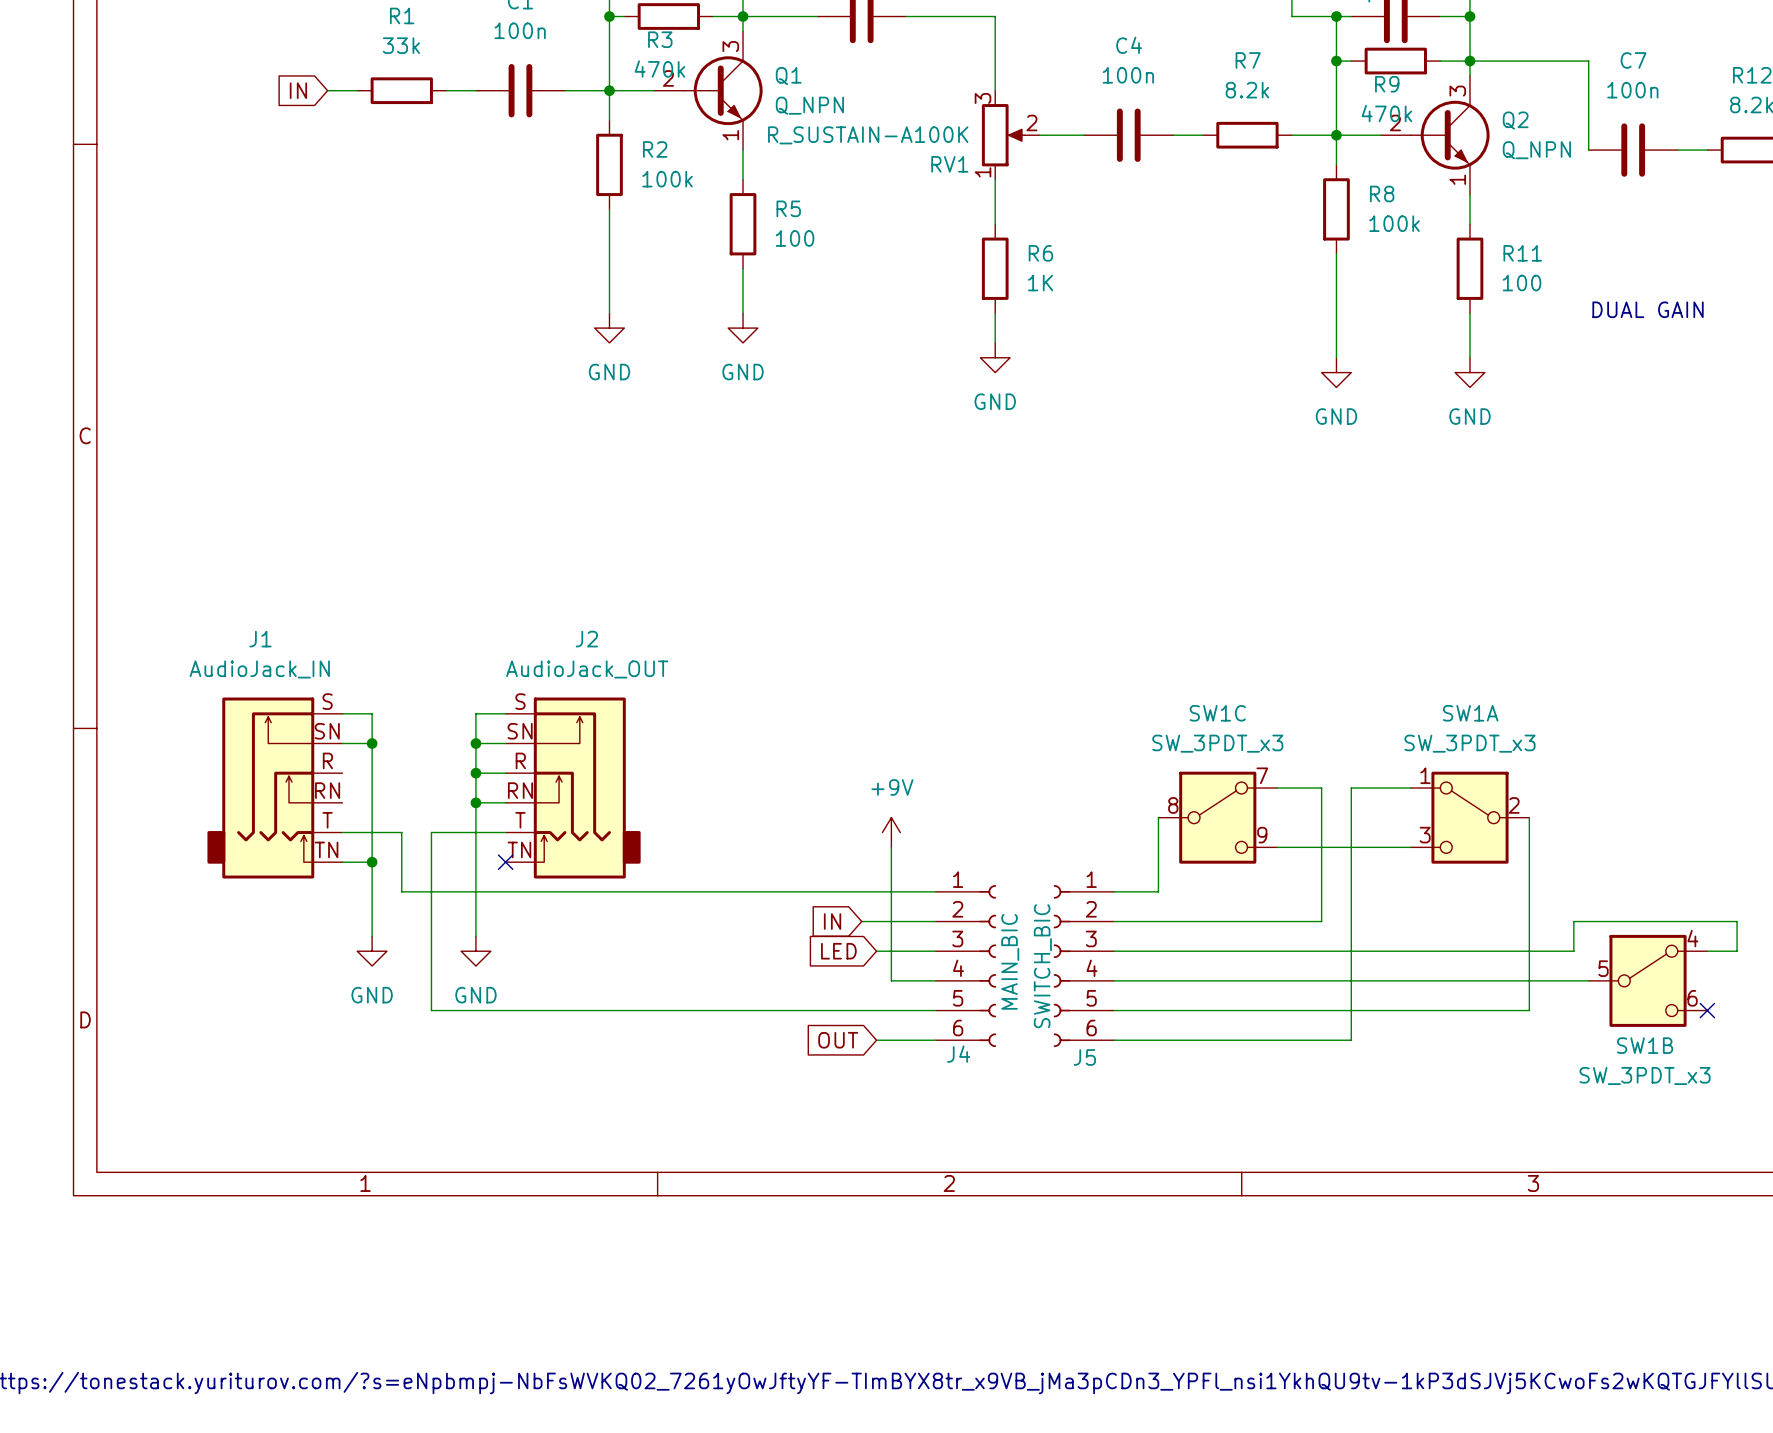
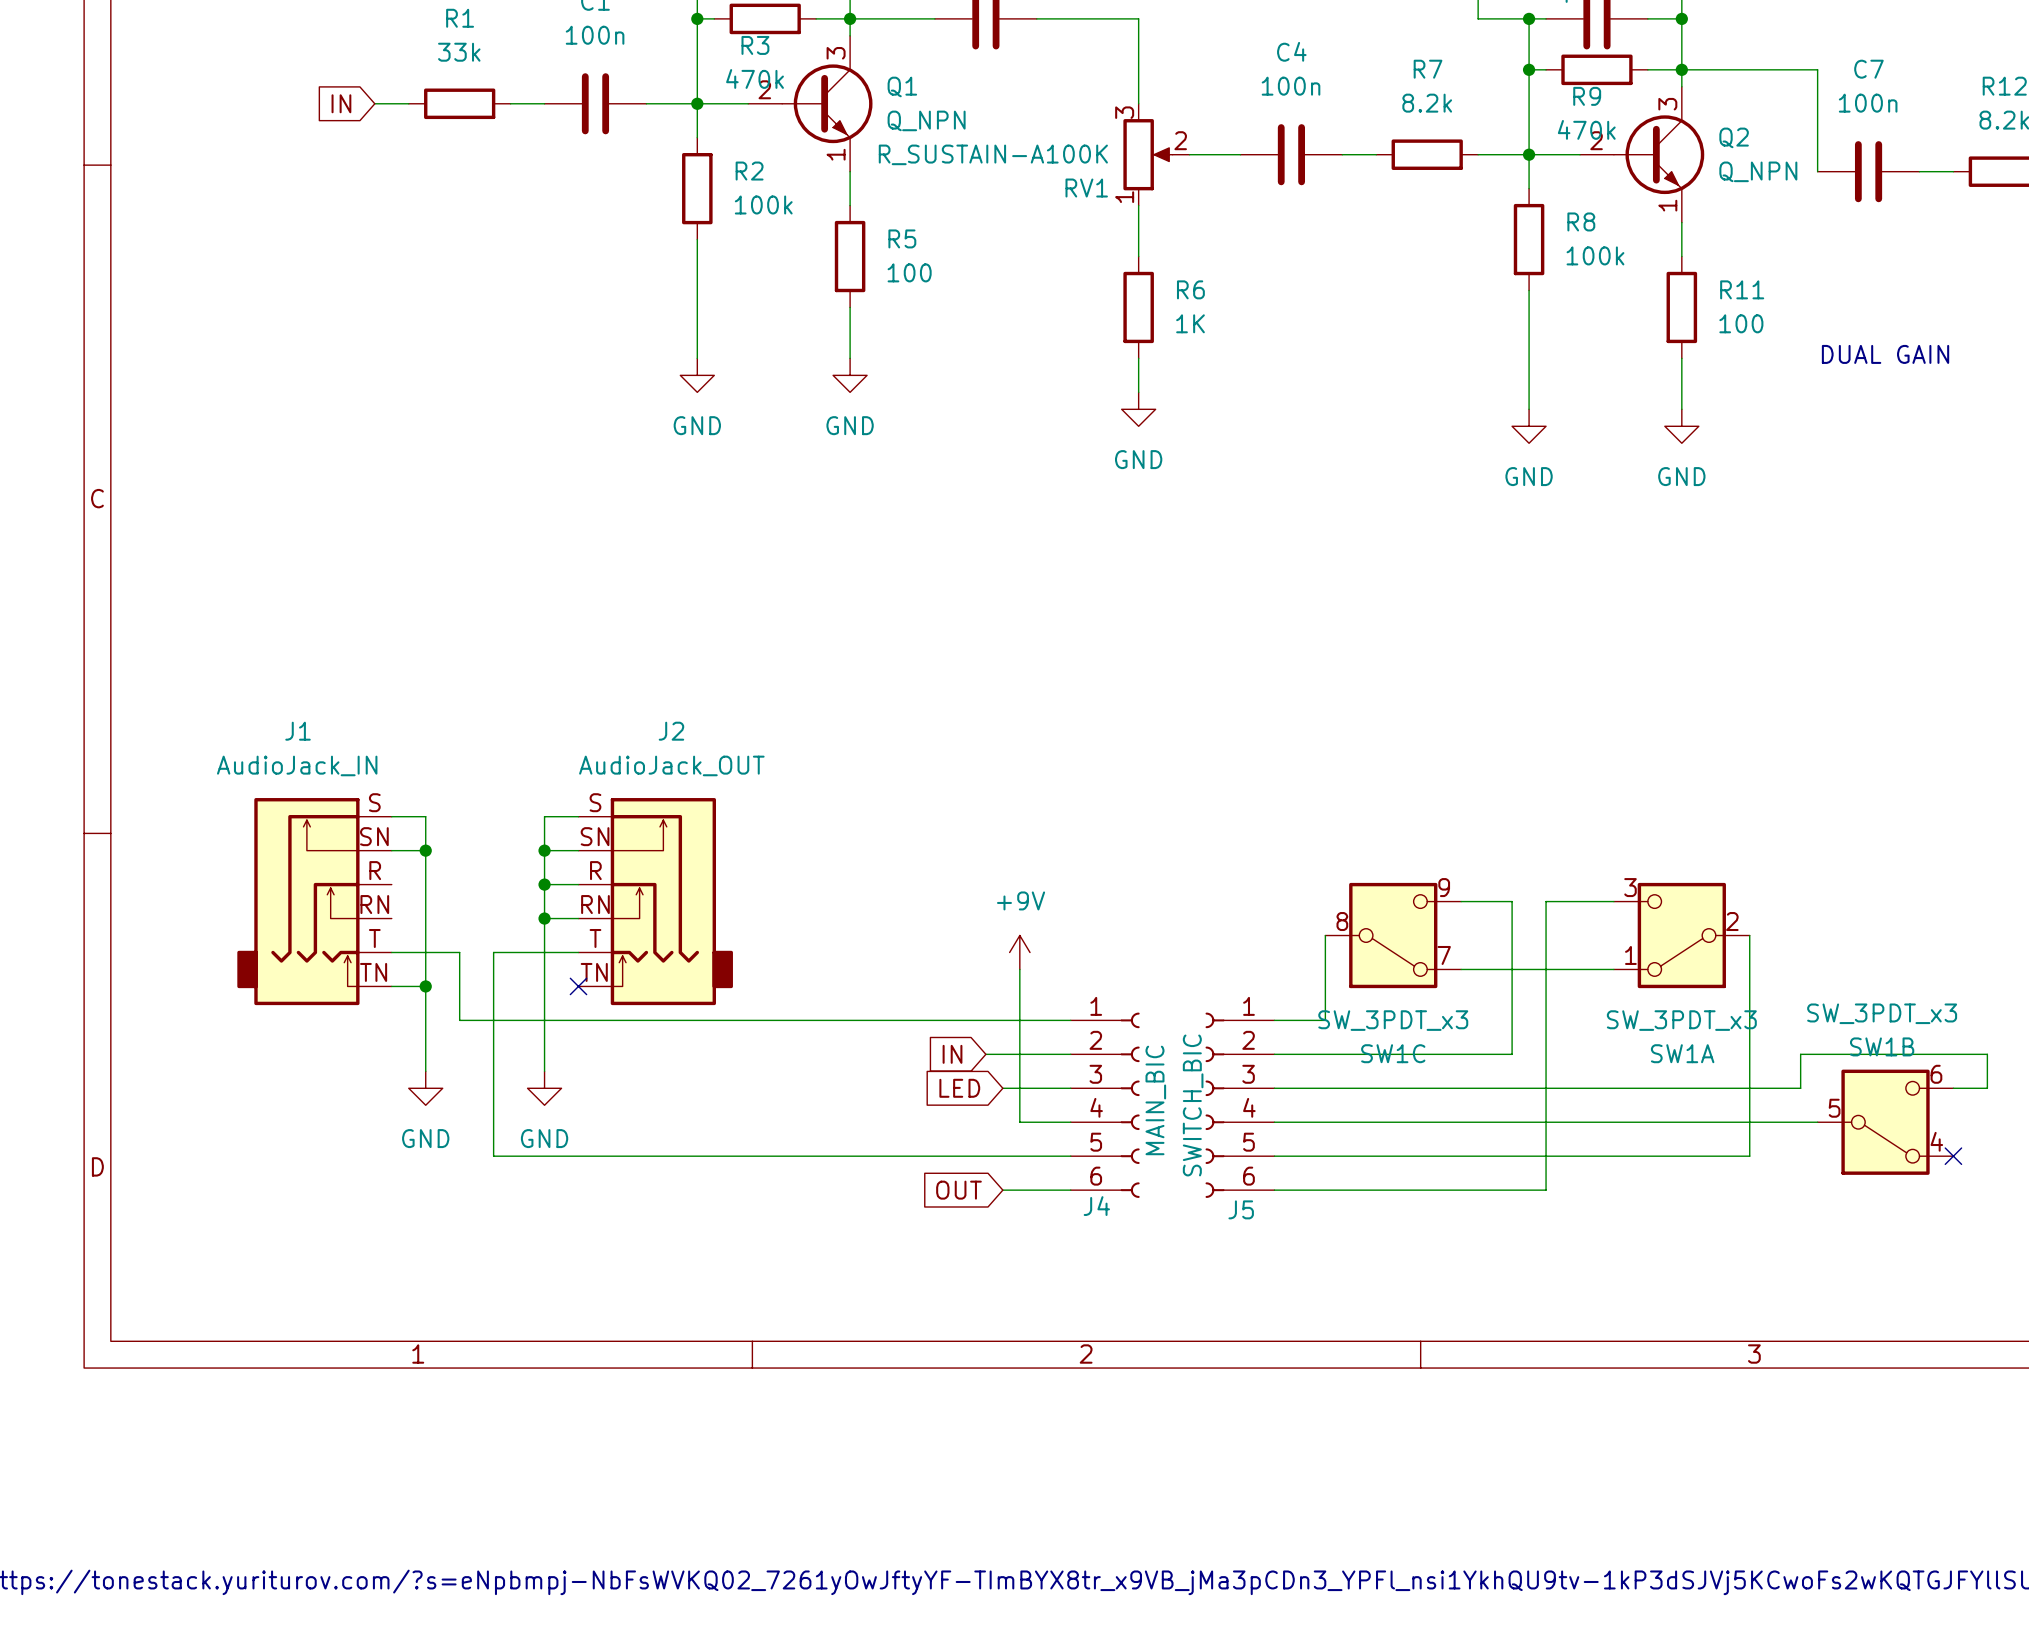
SW1C flip: as is (1217, 817) -> up-down (1393, 935)
SW1A flip: as is (1469, 817) -> up-down (1681, 935)
SW1B flip: as is (1648, 980) -> up-down (1885, 1122)

